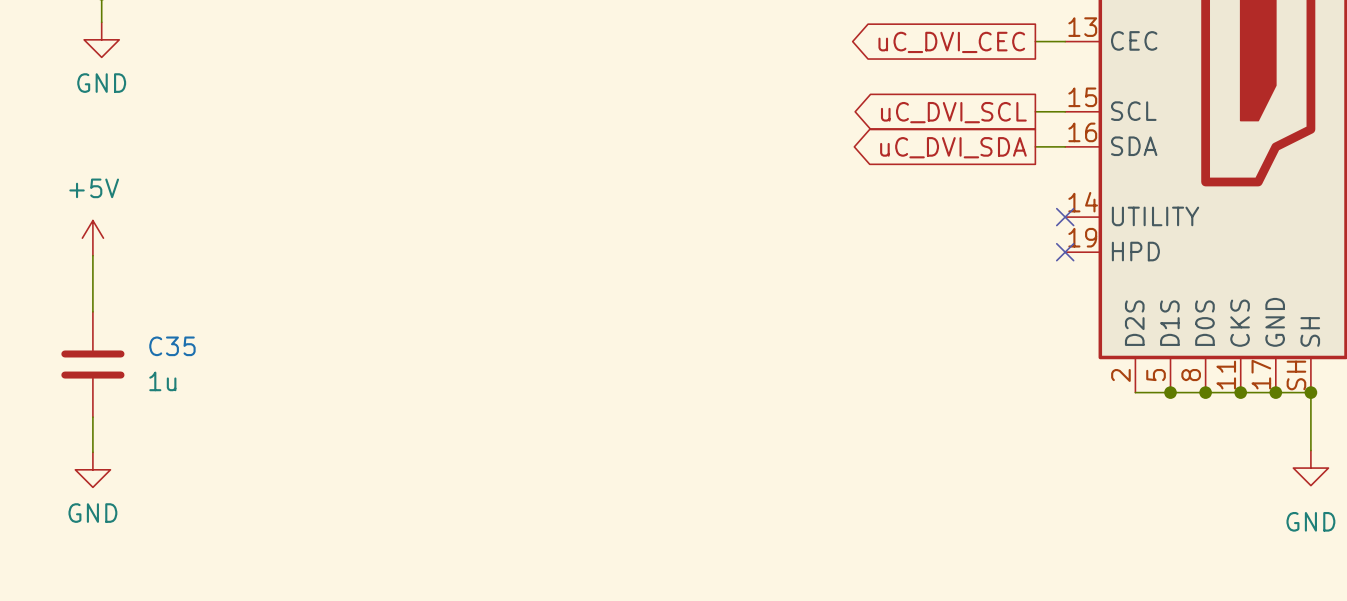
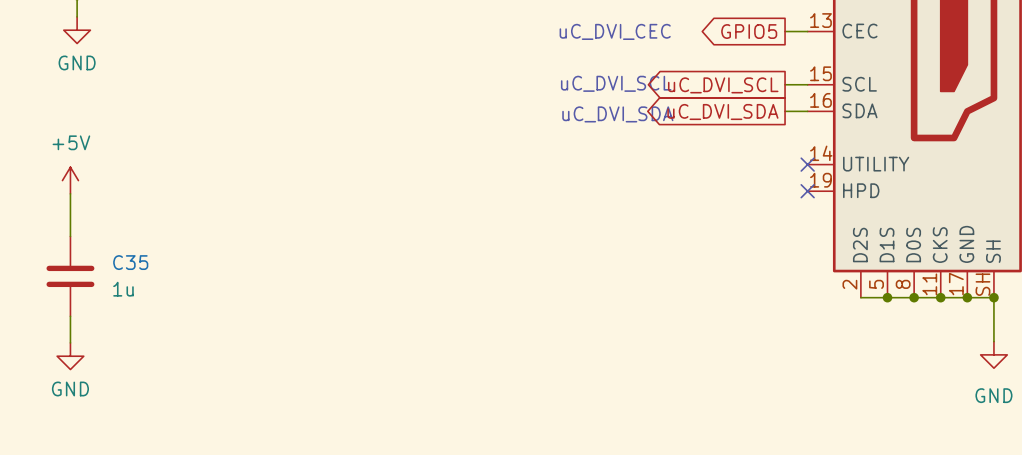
text: none -> uC_DVI_CEC (615, 31)
global label: uC_DVI_CEC (951, 42) -> GPIO5 (749, 31)
text: none -> uC_DVI_SCL (616, 83)
text: none -> uC_DVI_SDA (617, 114)

